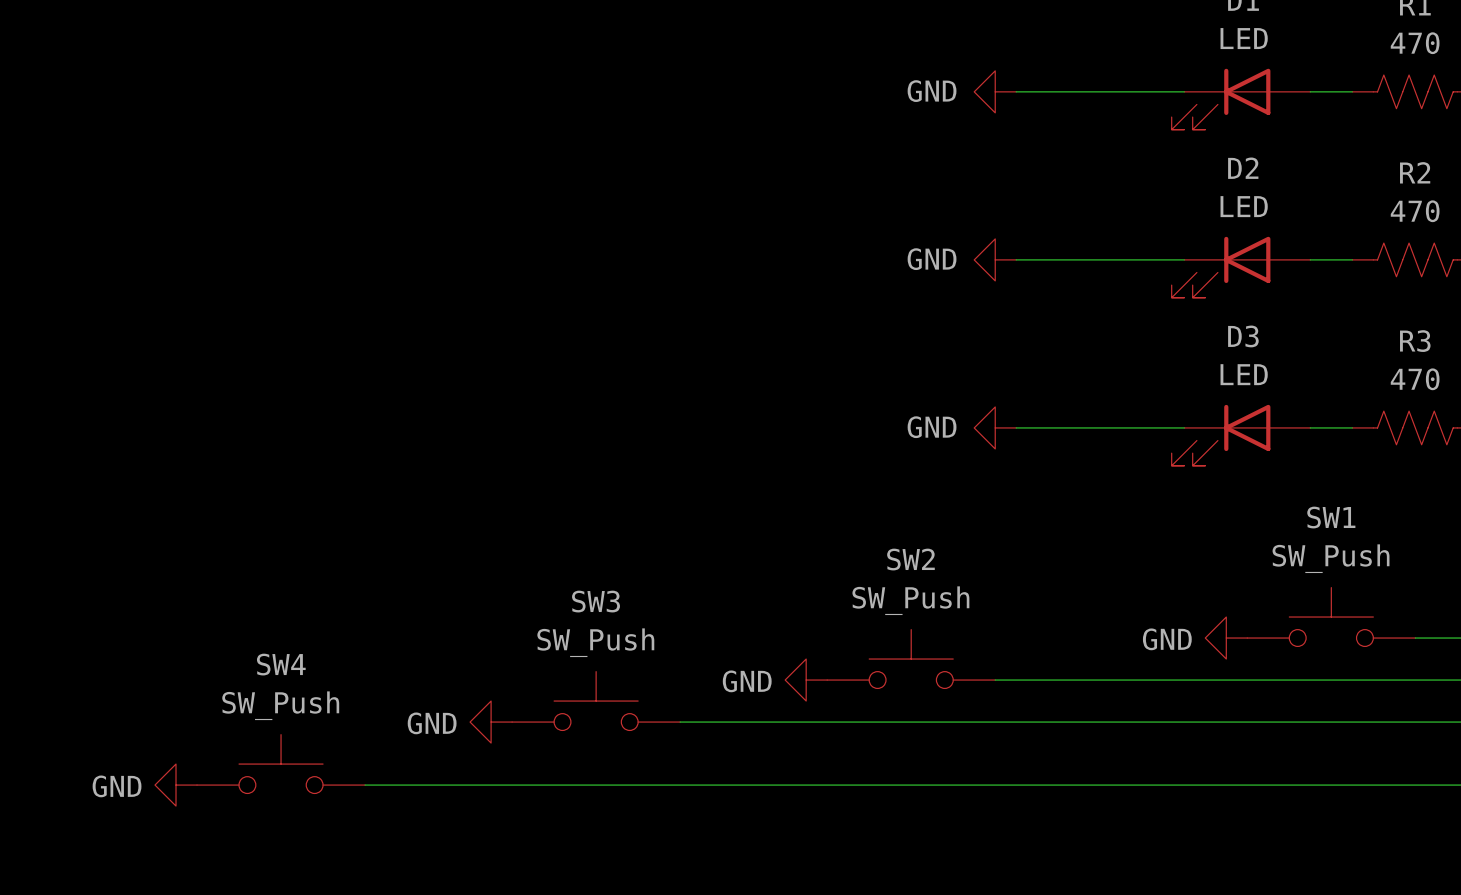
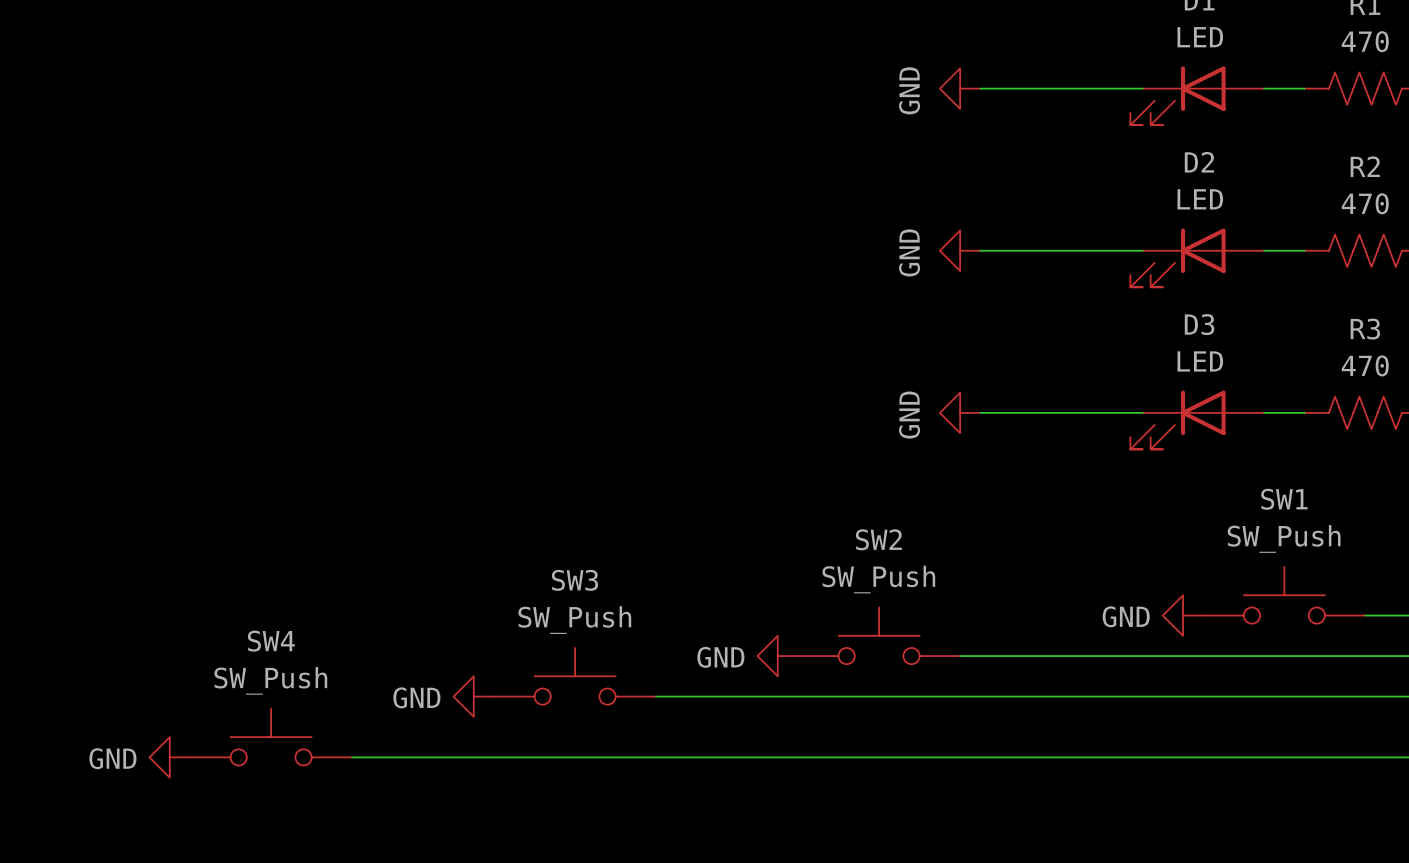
power symbol text rotation: 0° (932, 91) -> 90° counterclockwise (909, 90)
power symbol text rotation: 0° (932, 259) -> 90° counterclockwise (909, 252)
power symbol text rotation: 0° (932, 427) -> 90° counterclockwise (909, 415)

